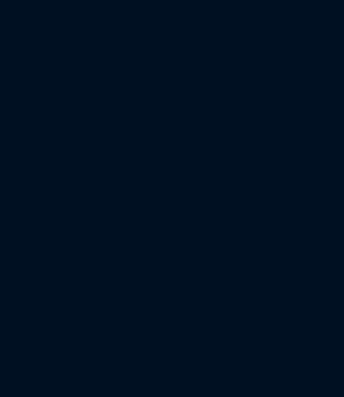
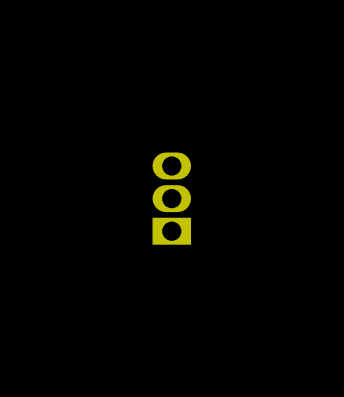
part: none -> (171, 198)

